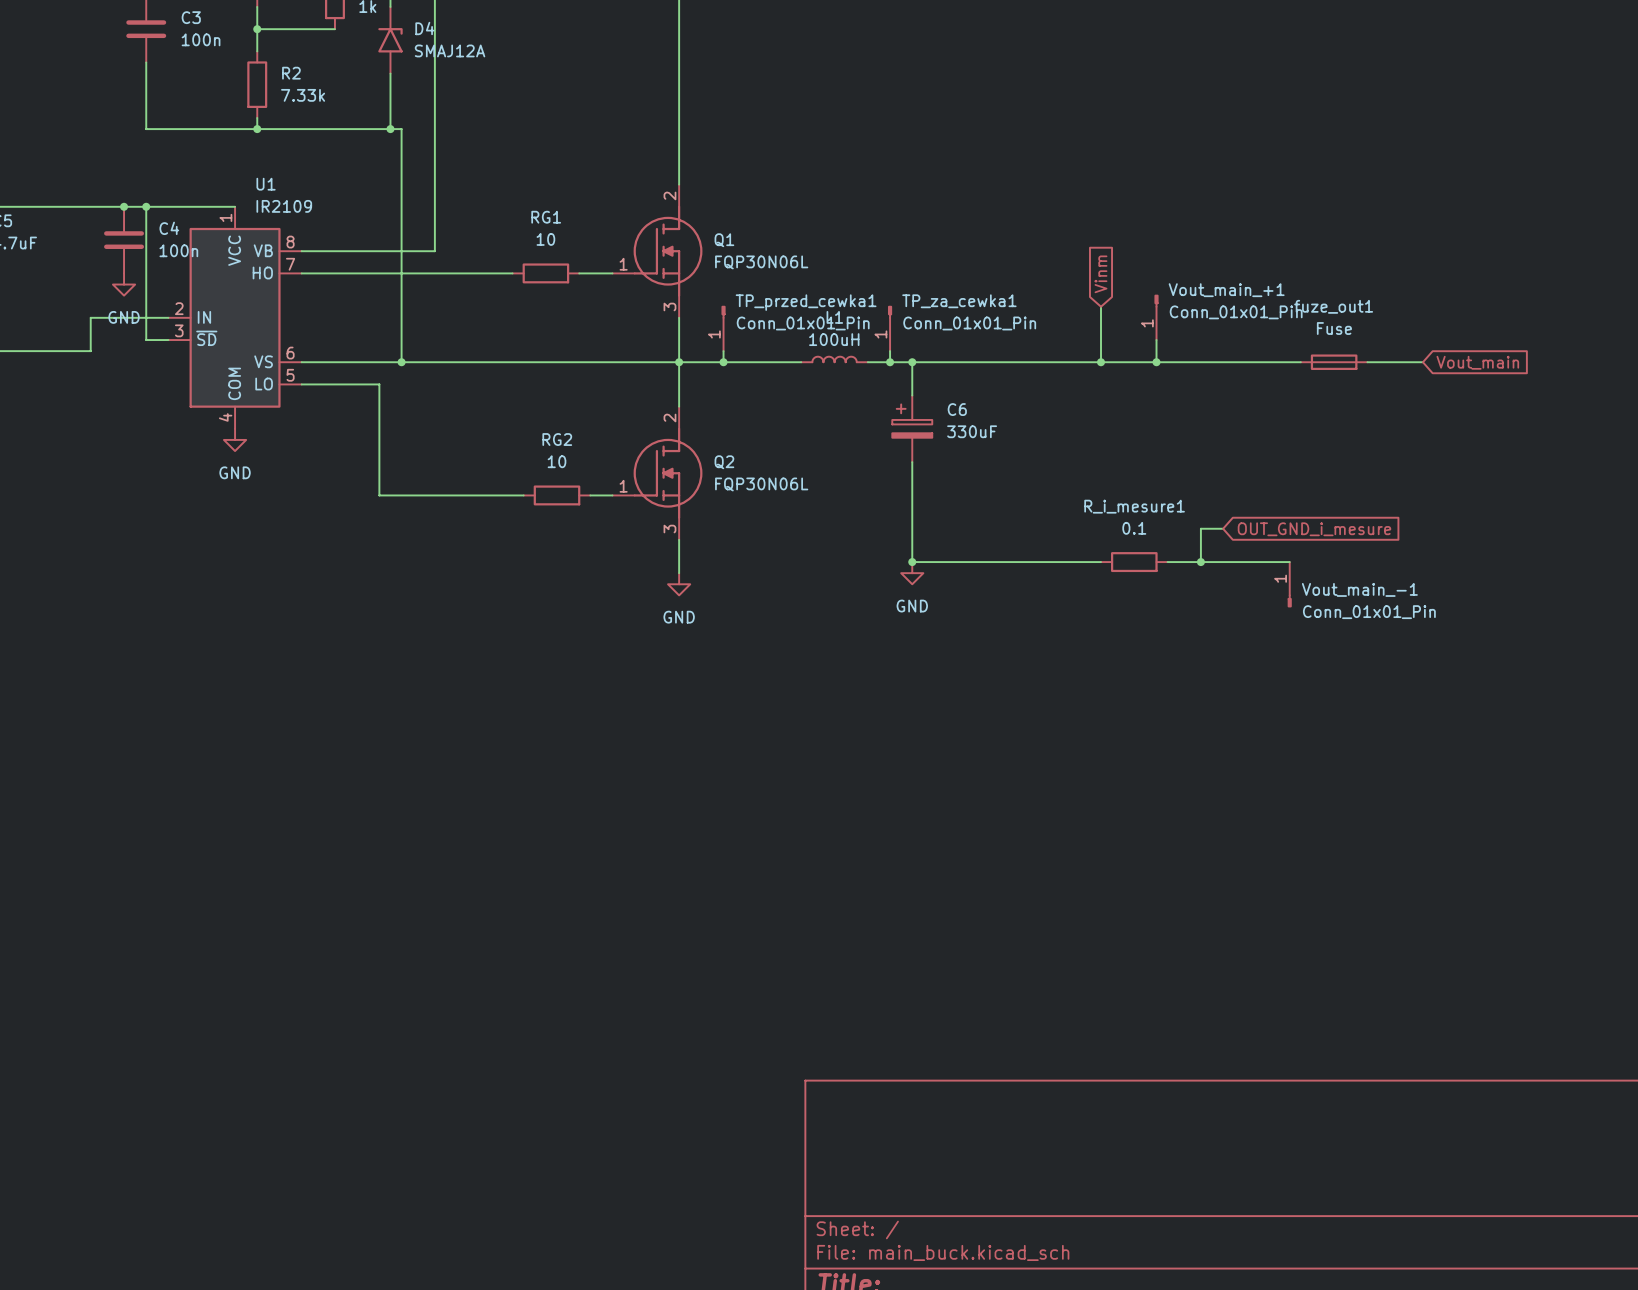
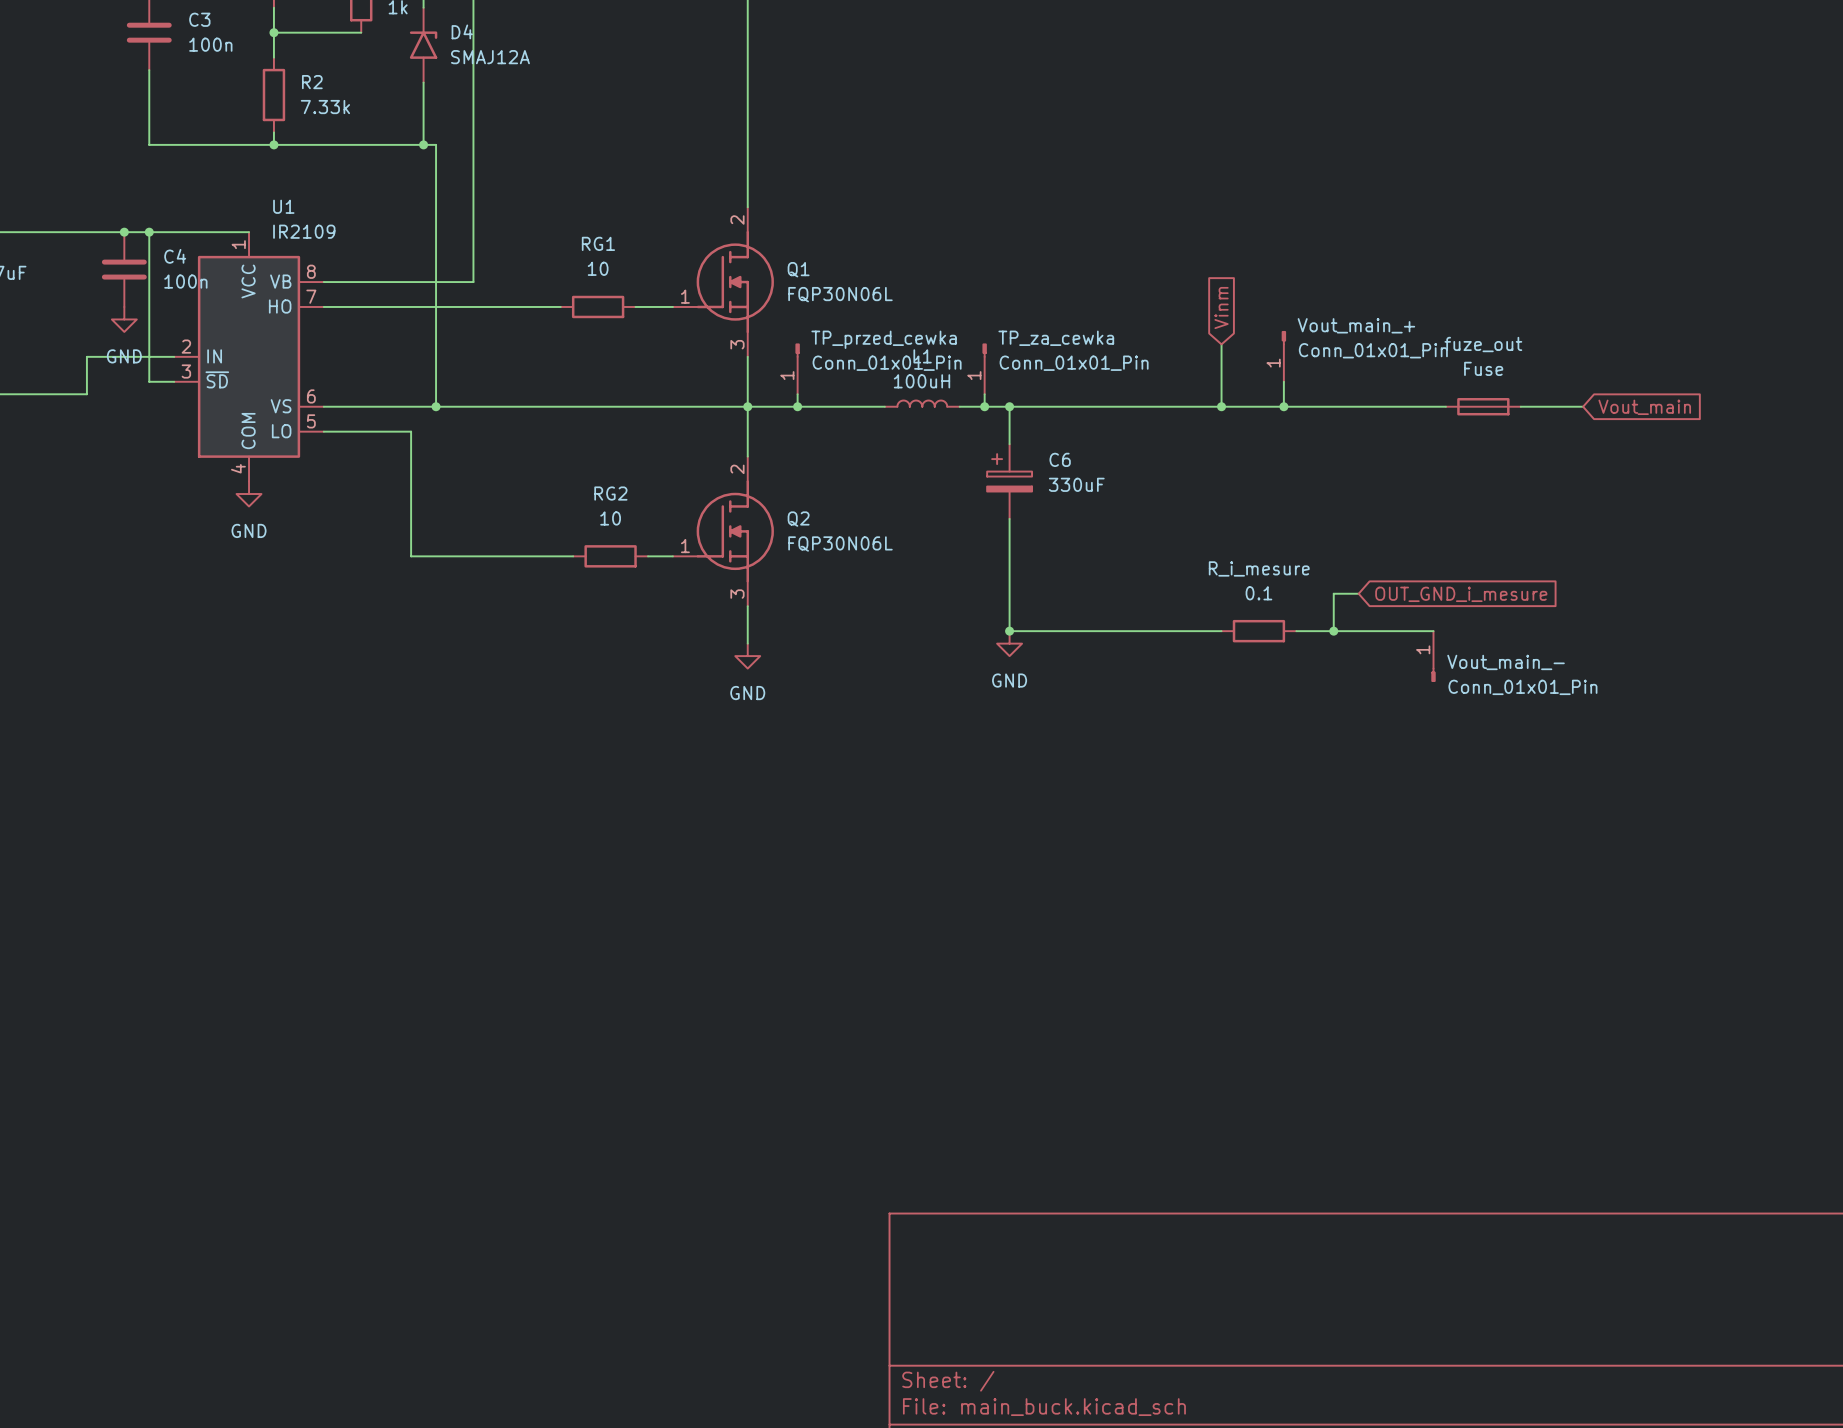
Vout_main_+1 name: Vout_main_+1 (1226, 290) -> Vout_main_+ (1356, 325)
TP_za_cewka1 name: TP_za_cewka1 (959, 301) -> TP_za_cewka (1056, 338)
TP_przed_cewka1 name: TP_przed_cewka1 (806, 302) -> TP_przed_cewka (884, 339)
fuze_out1 name: fuze_out1 (1333, 306) -> fuze_out (1483, 344)
R_i_mesure1 name: R_i_mesure1 (1134, 506) -> R_i_mesure (1259, 568)
Vout_main_-1 name: Vout_main_-1 (1359, 589) -> Vout_main_- (1506, 662)

